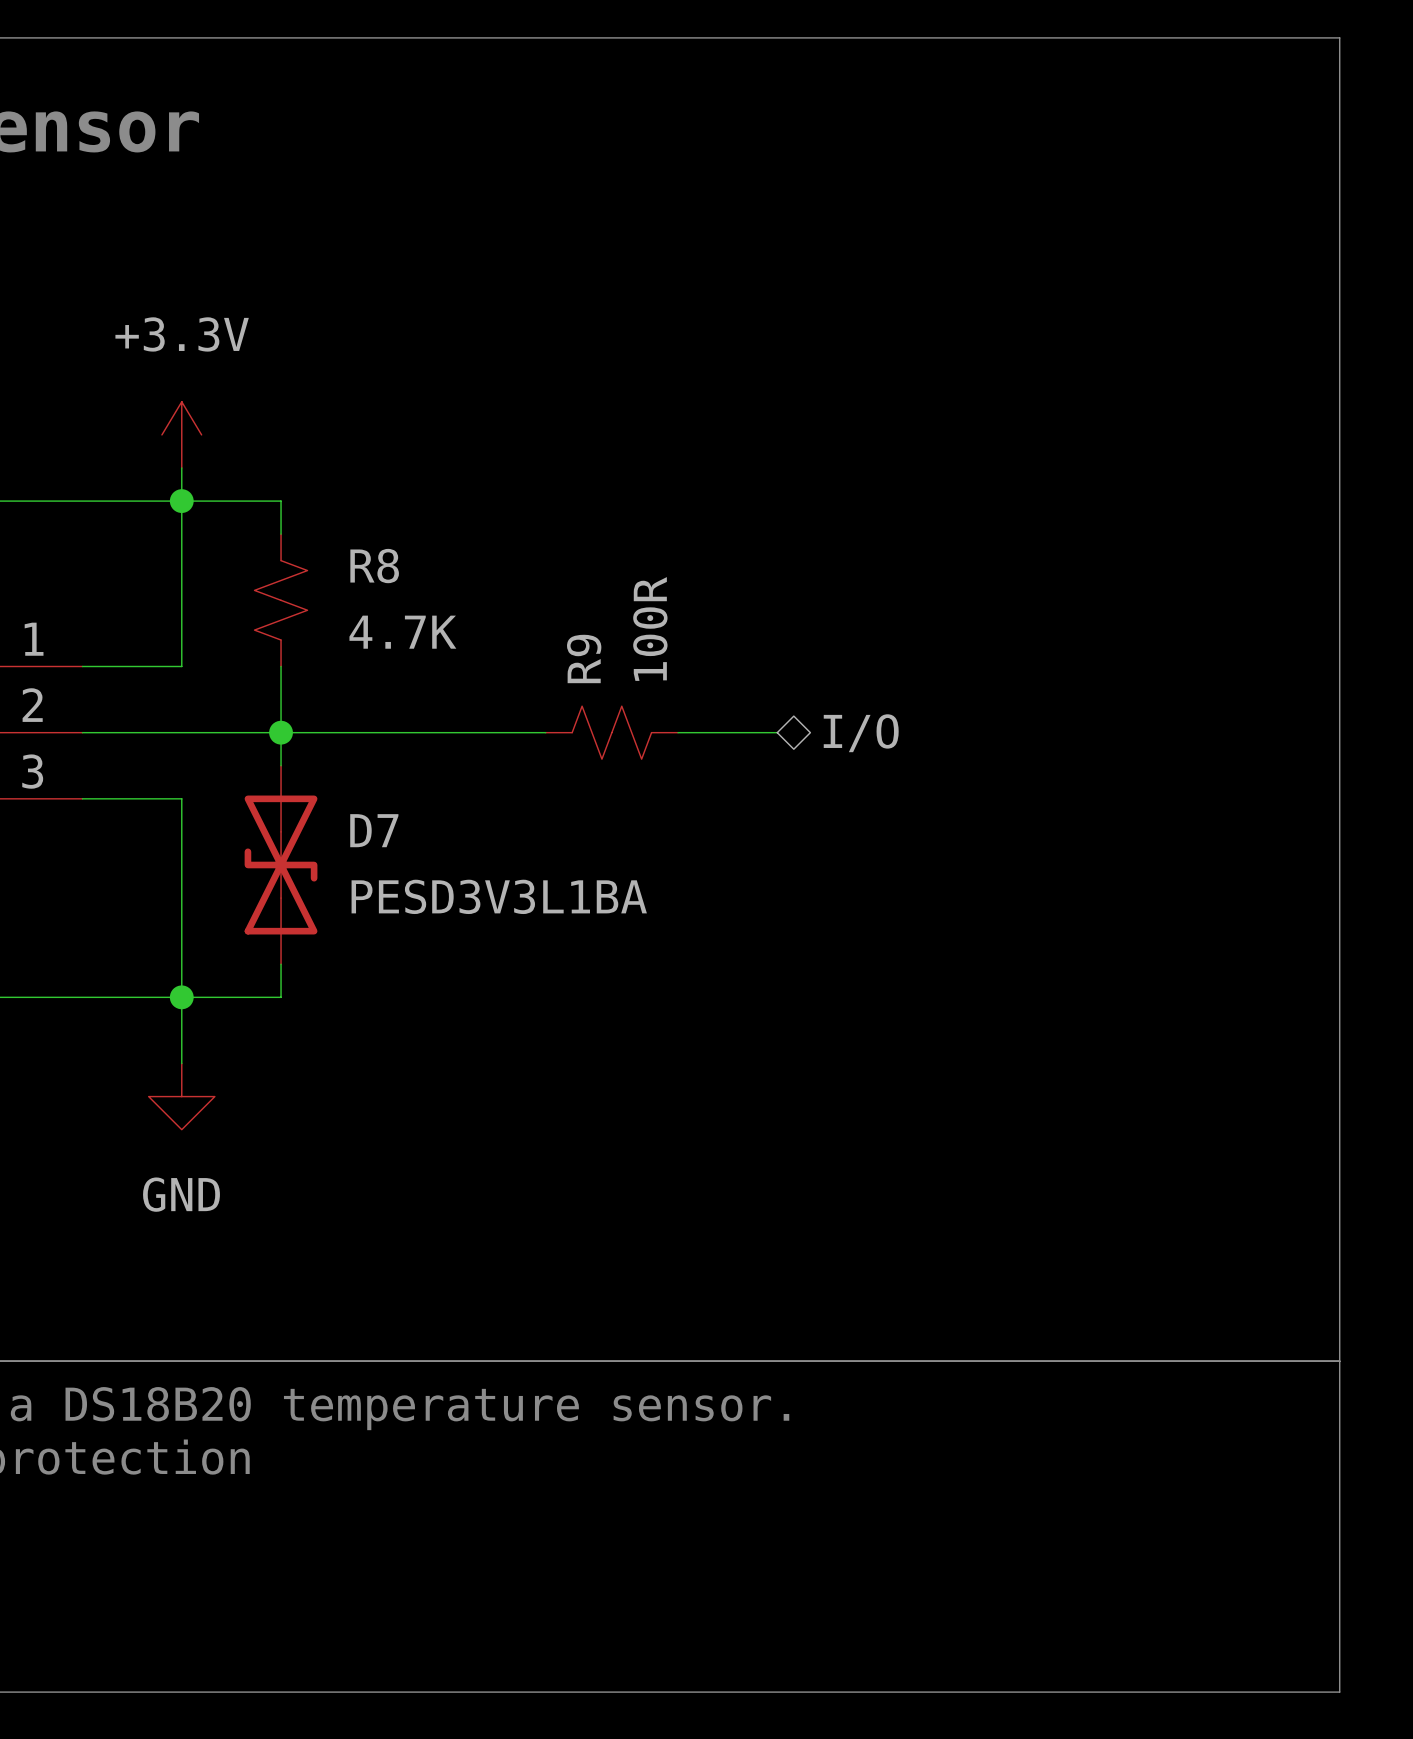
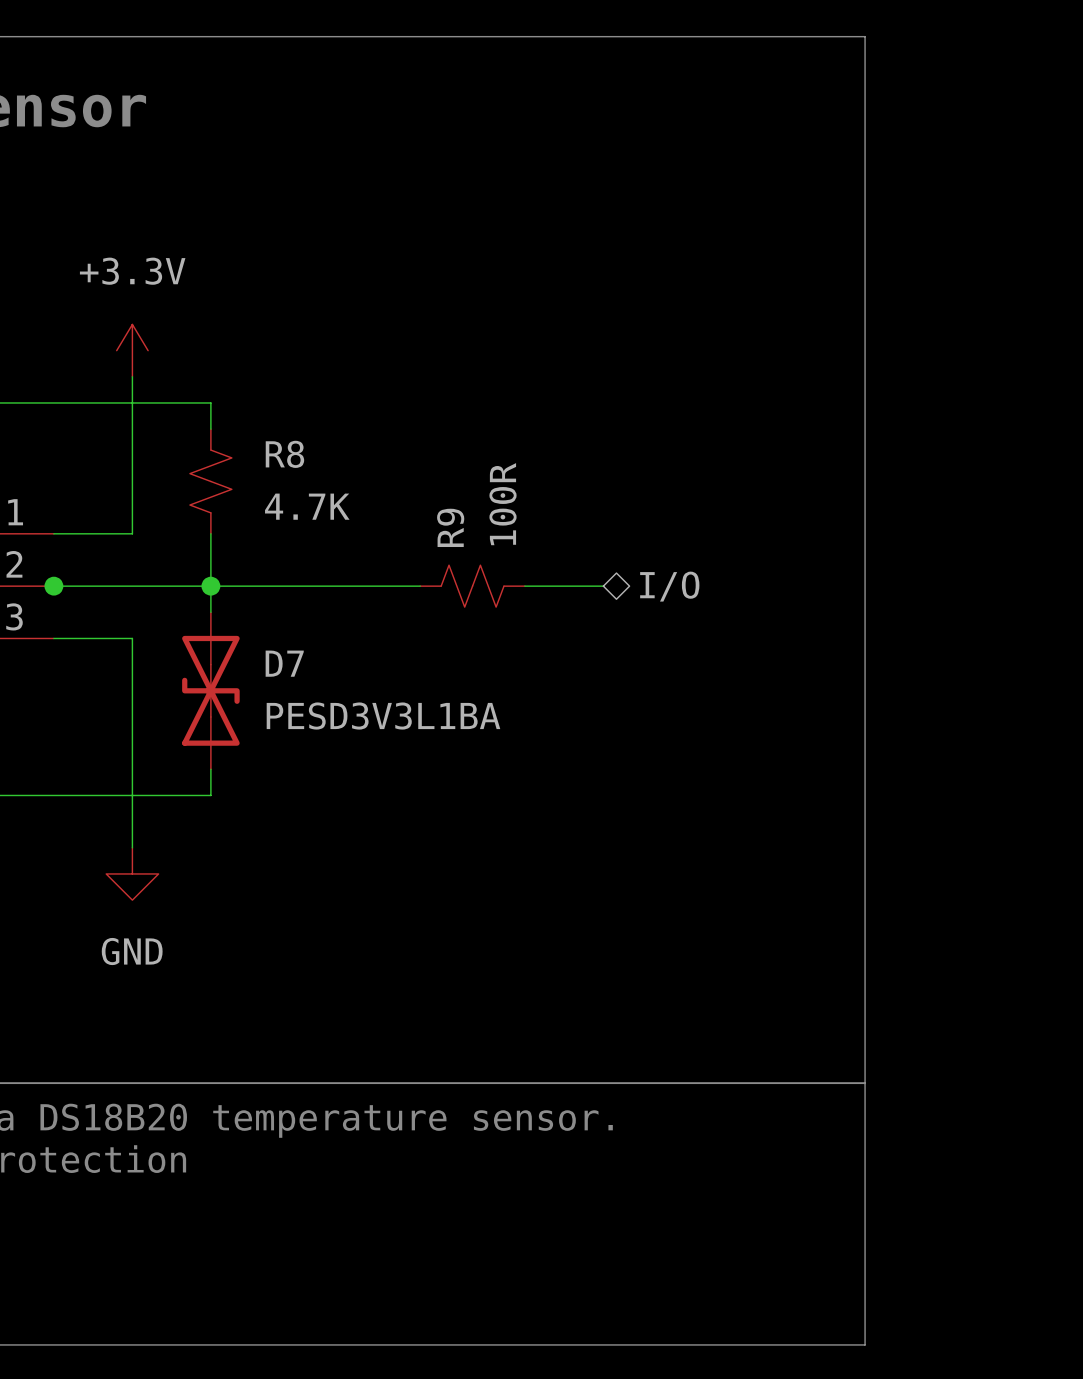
line: (1108, 37) (1339, 37) (1339, 1692) (1108, 1692) -> (865, 36) (865, 1344)
junction: (181, 501) -> none
junction: none -> (53, 586)
junction: (181, 997) -> none
line: (1108, 1361) (1339, 1361) -> none

